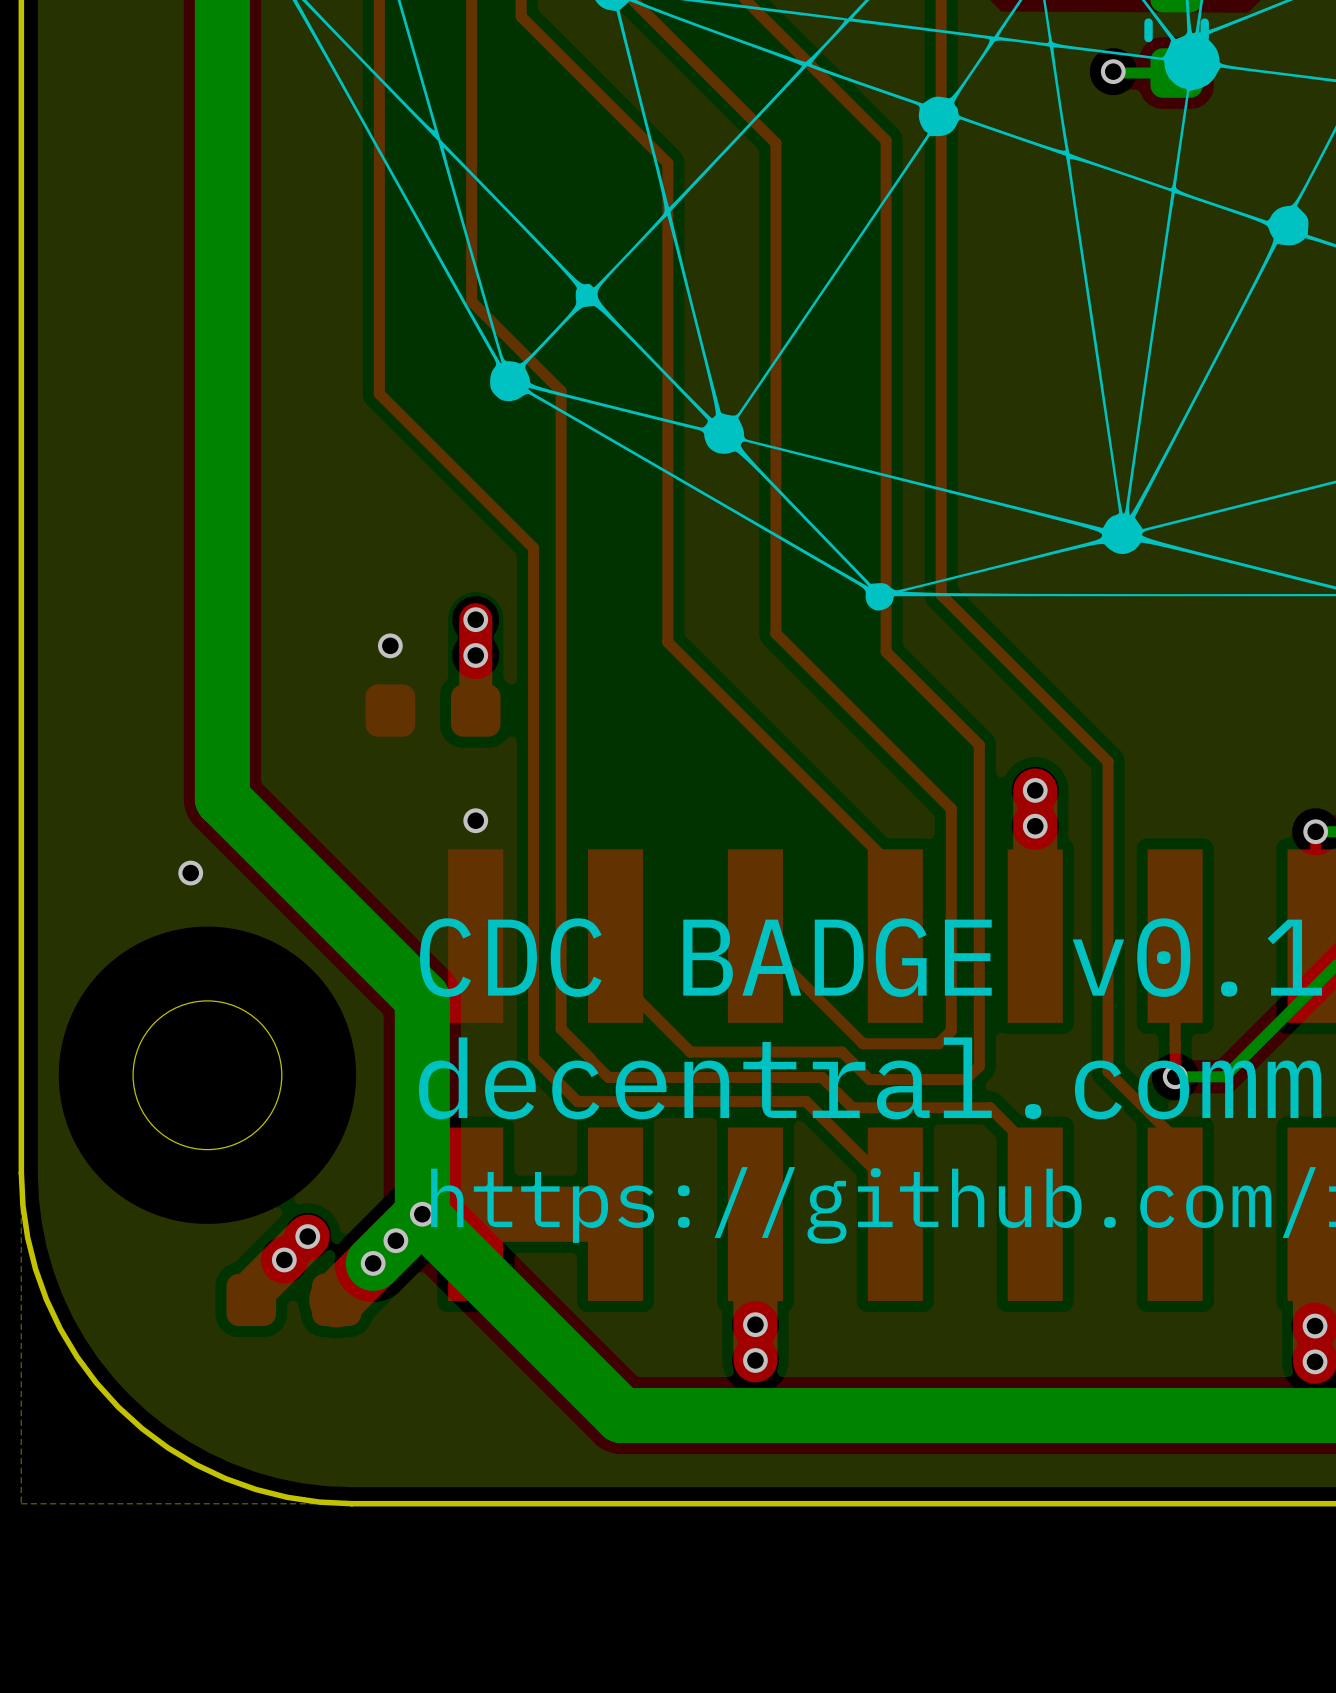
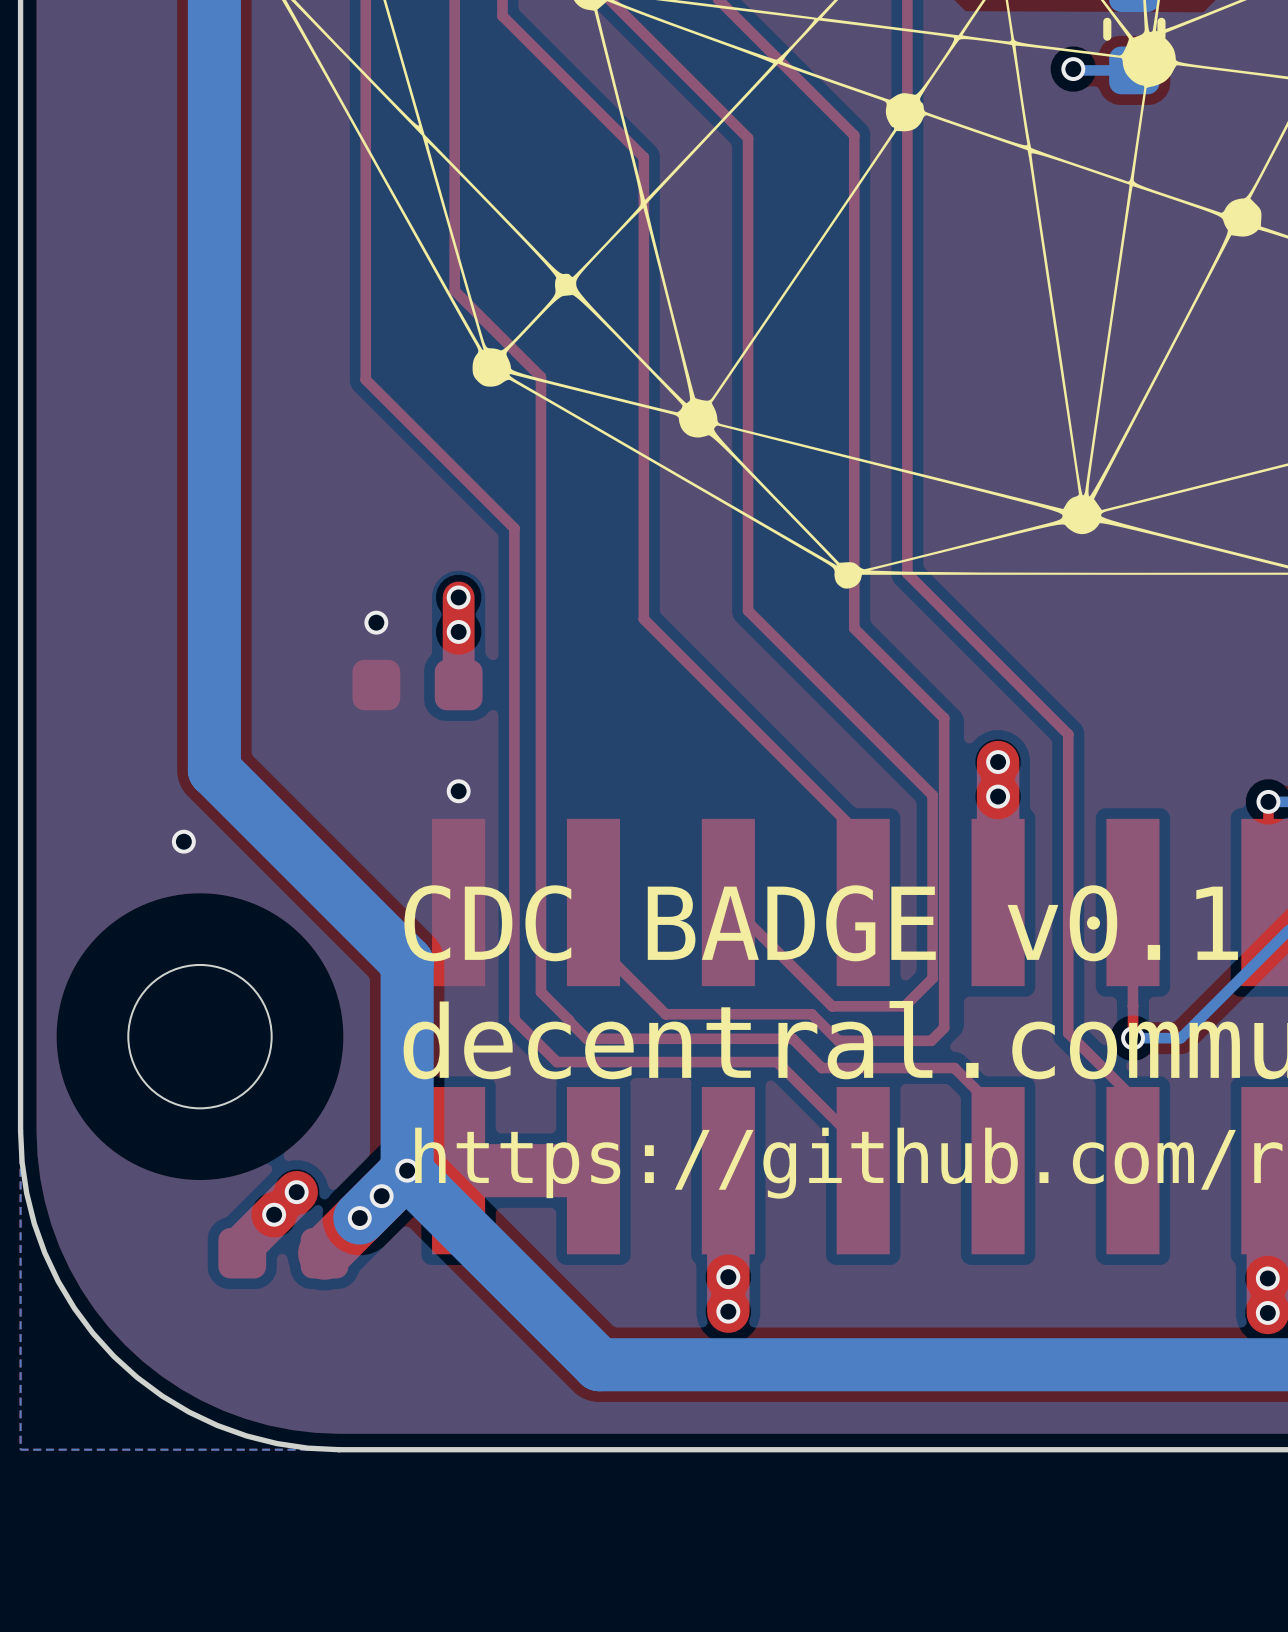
top track: (951, 808) (951, 1030) -> (917, 779) (932, 795) (932, 978) (917, 993)

